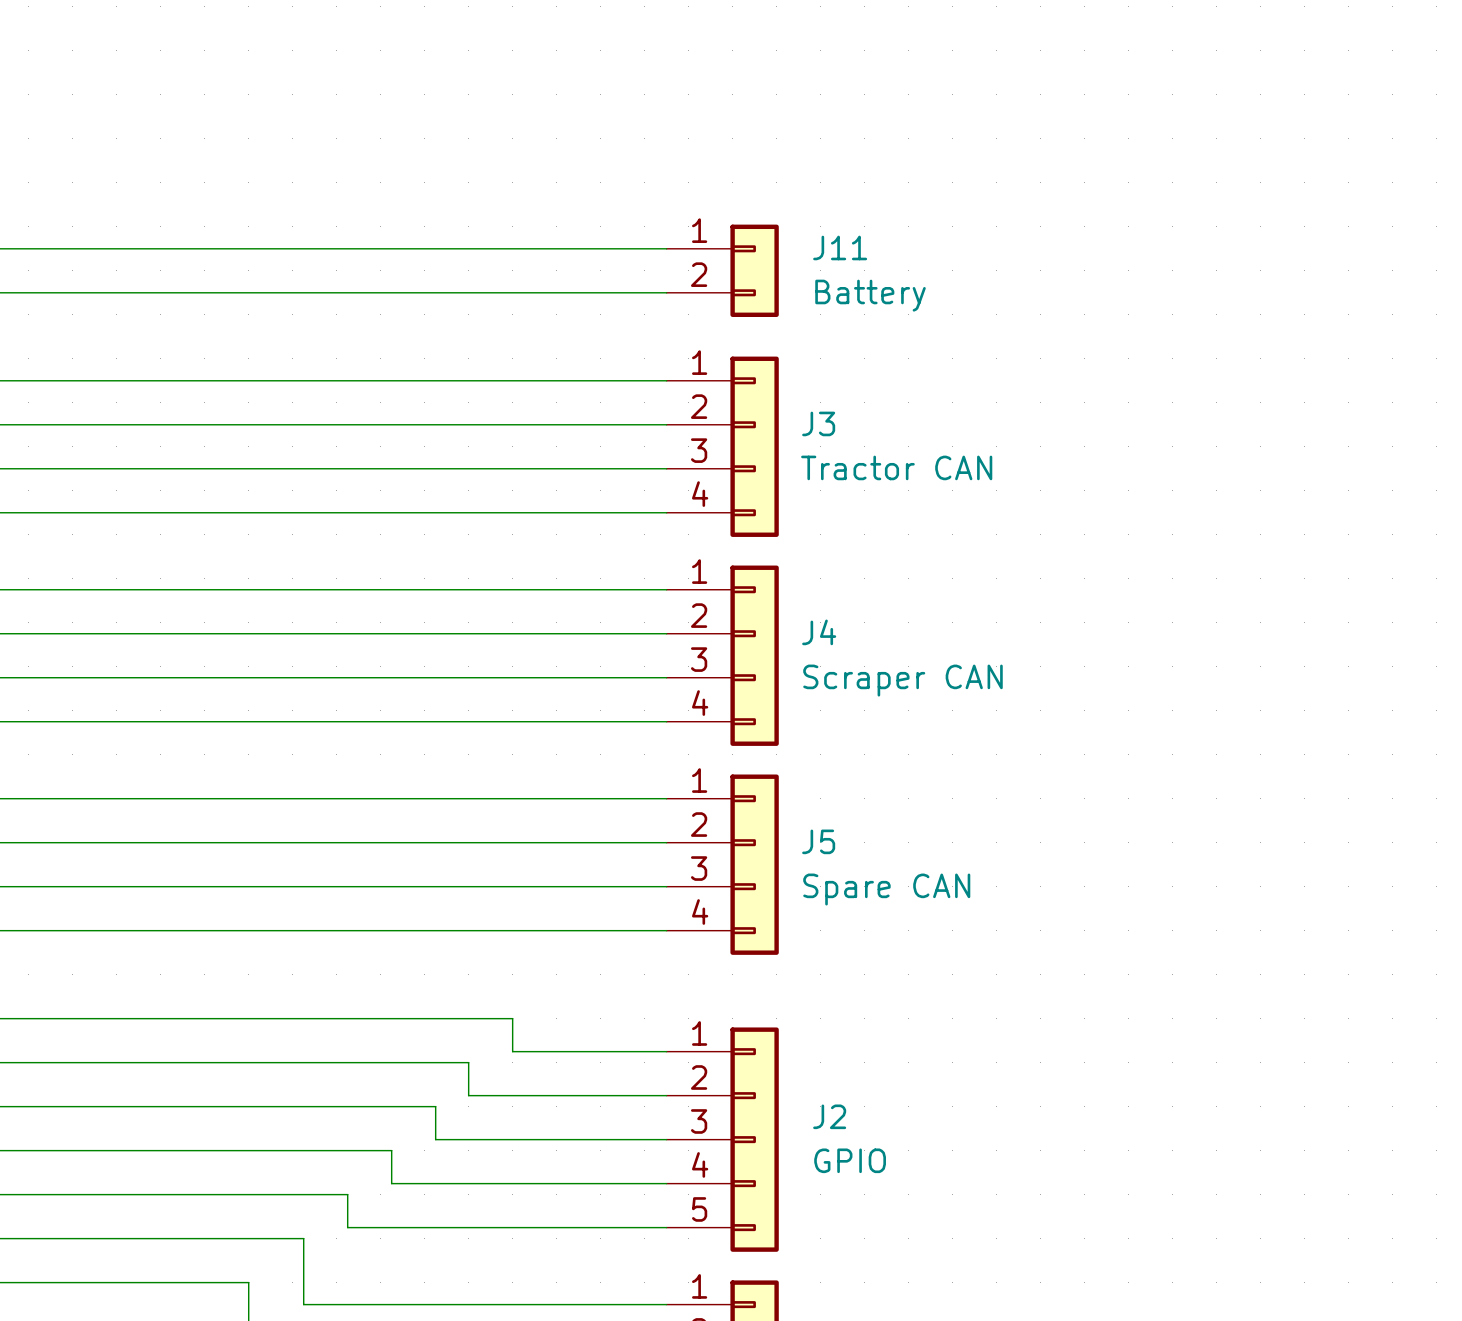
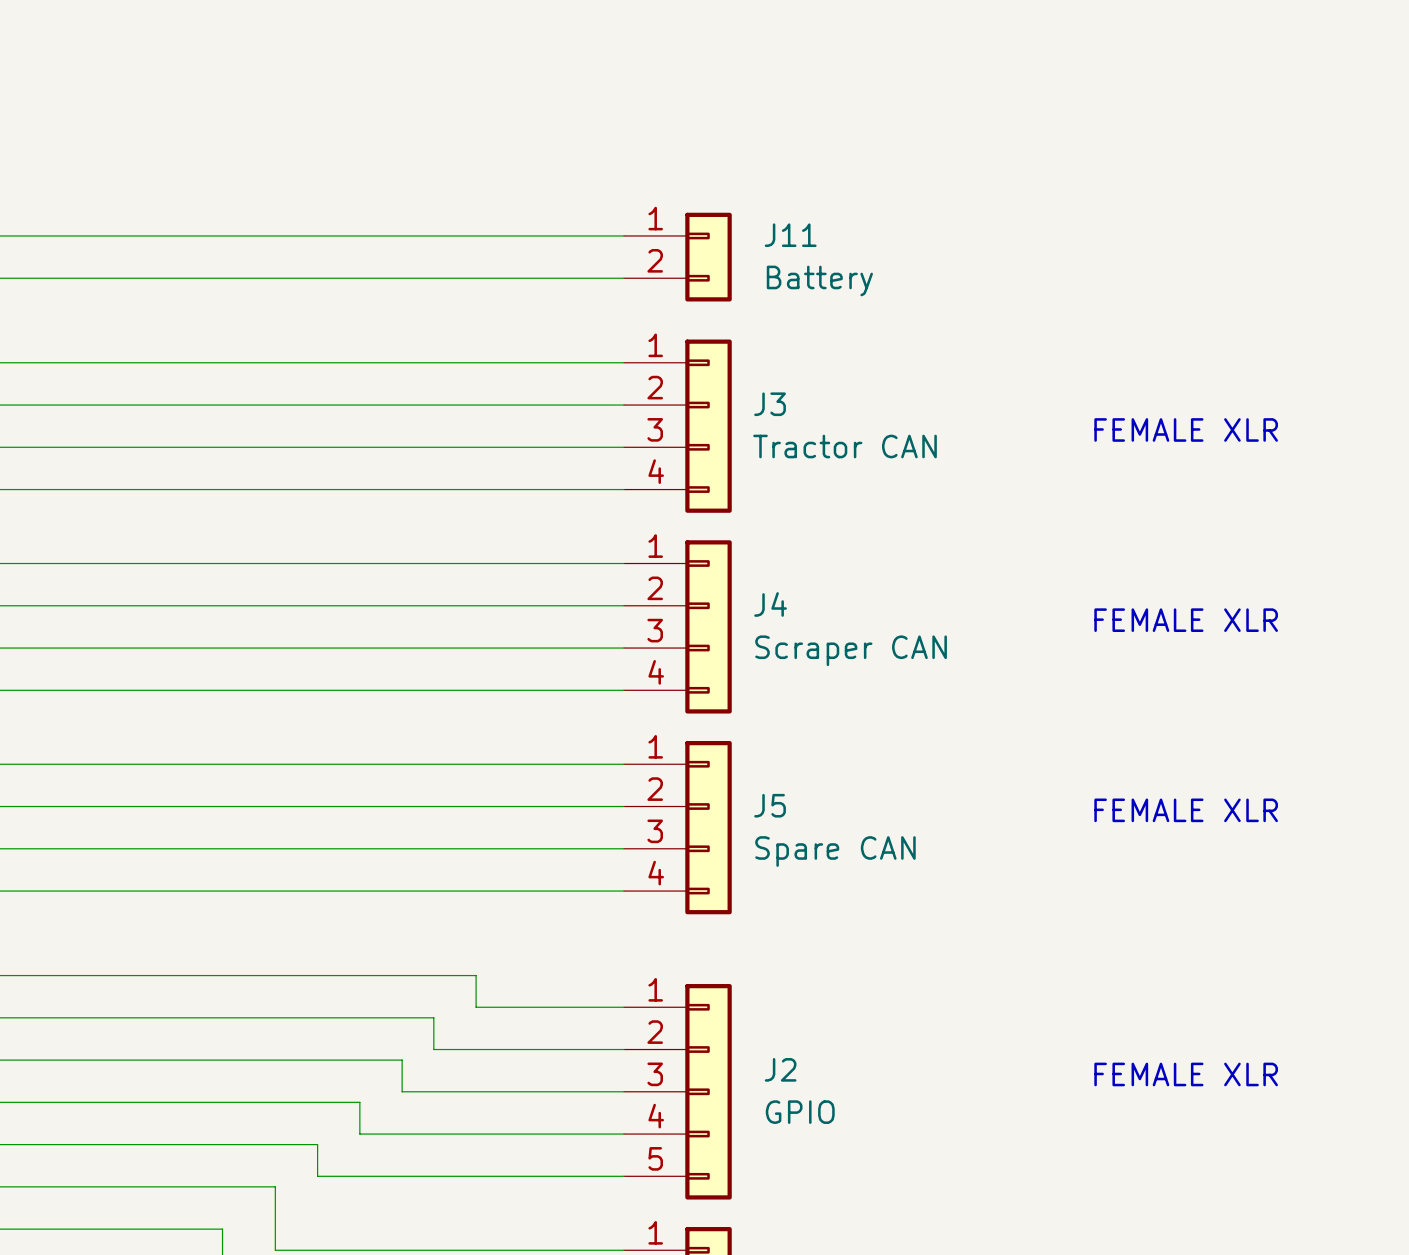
text: none -> FEMALE XLR (1186, 429)
text: none -> FEMALE XLR (1186, 620)
text: none -> FEMALE XLR (1186, 810)
text: none -> FEMALE XLR (1186, 1074)

